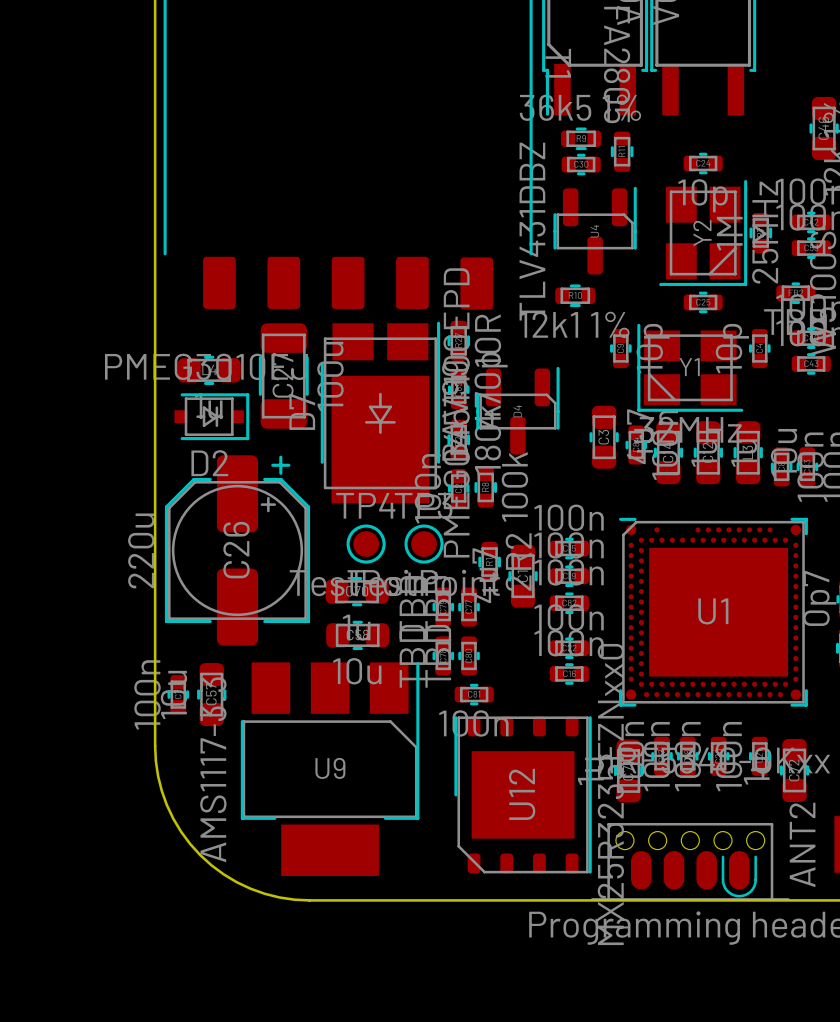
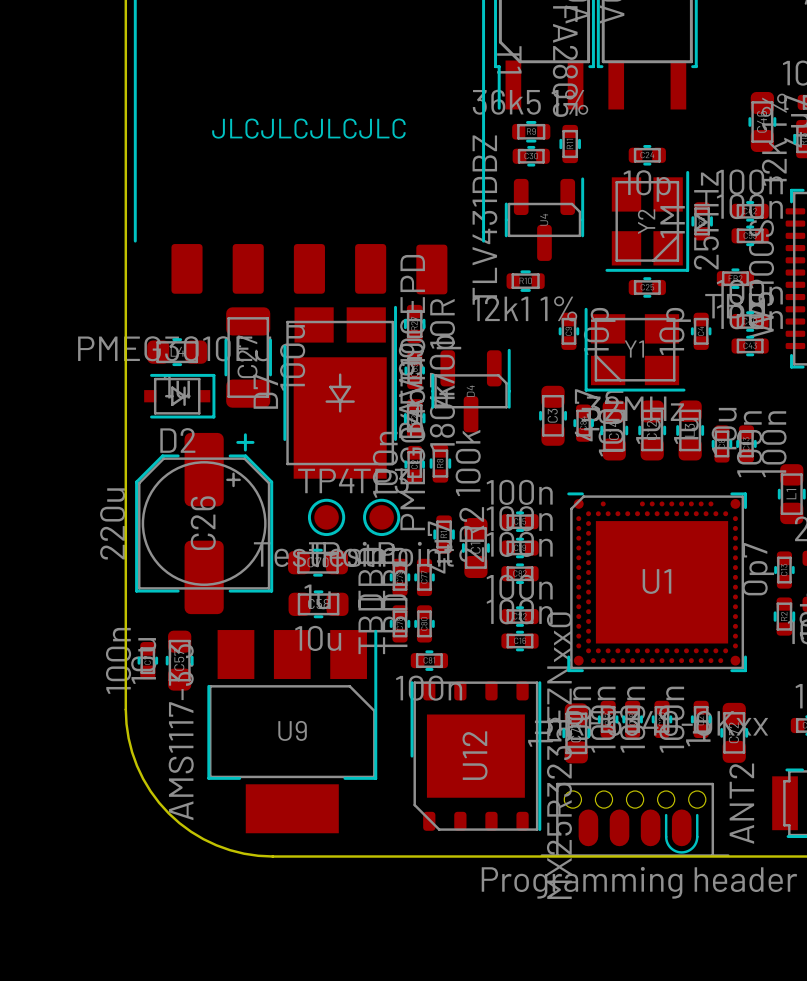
text: none -> JLCJLCJLCJLC (308, 128)

